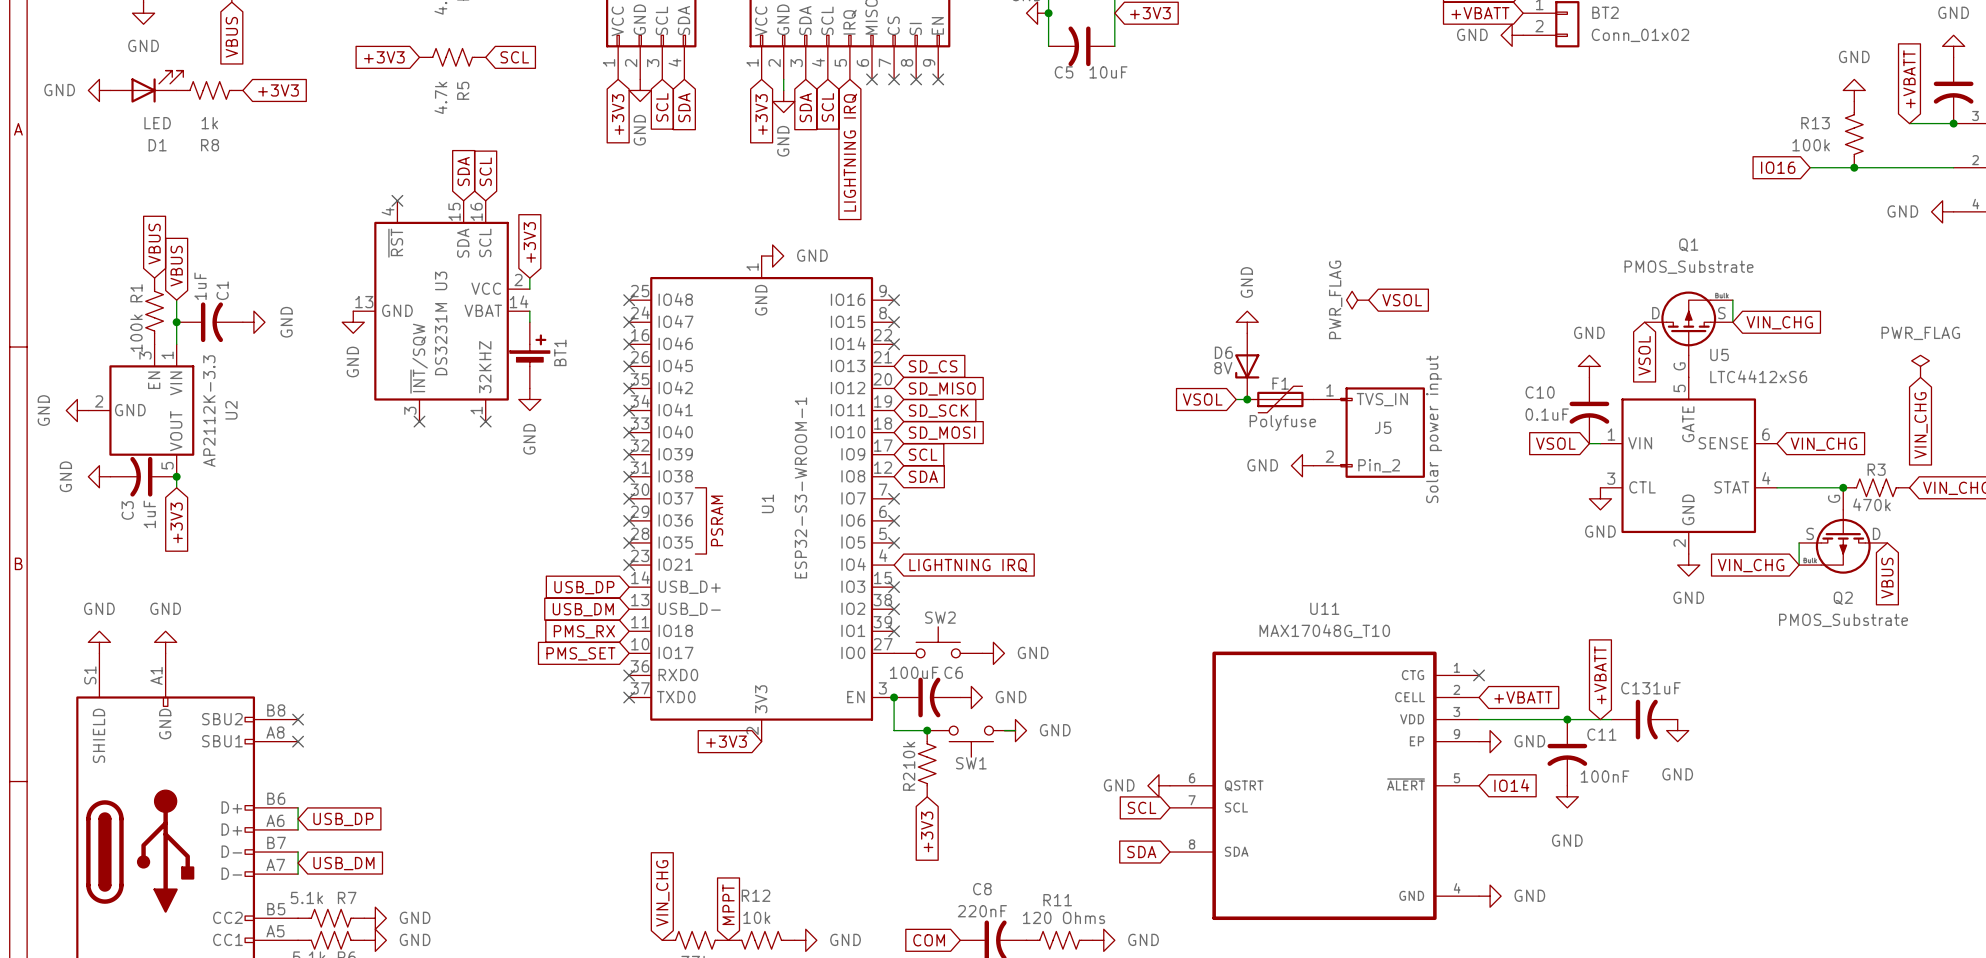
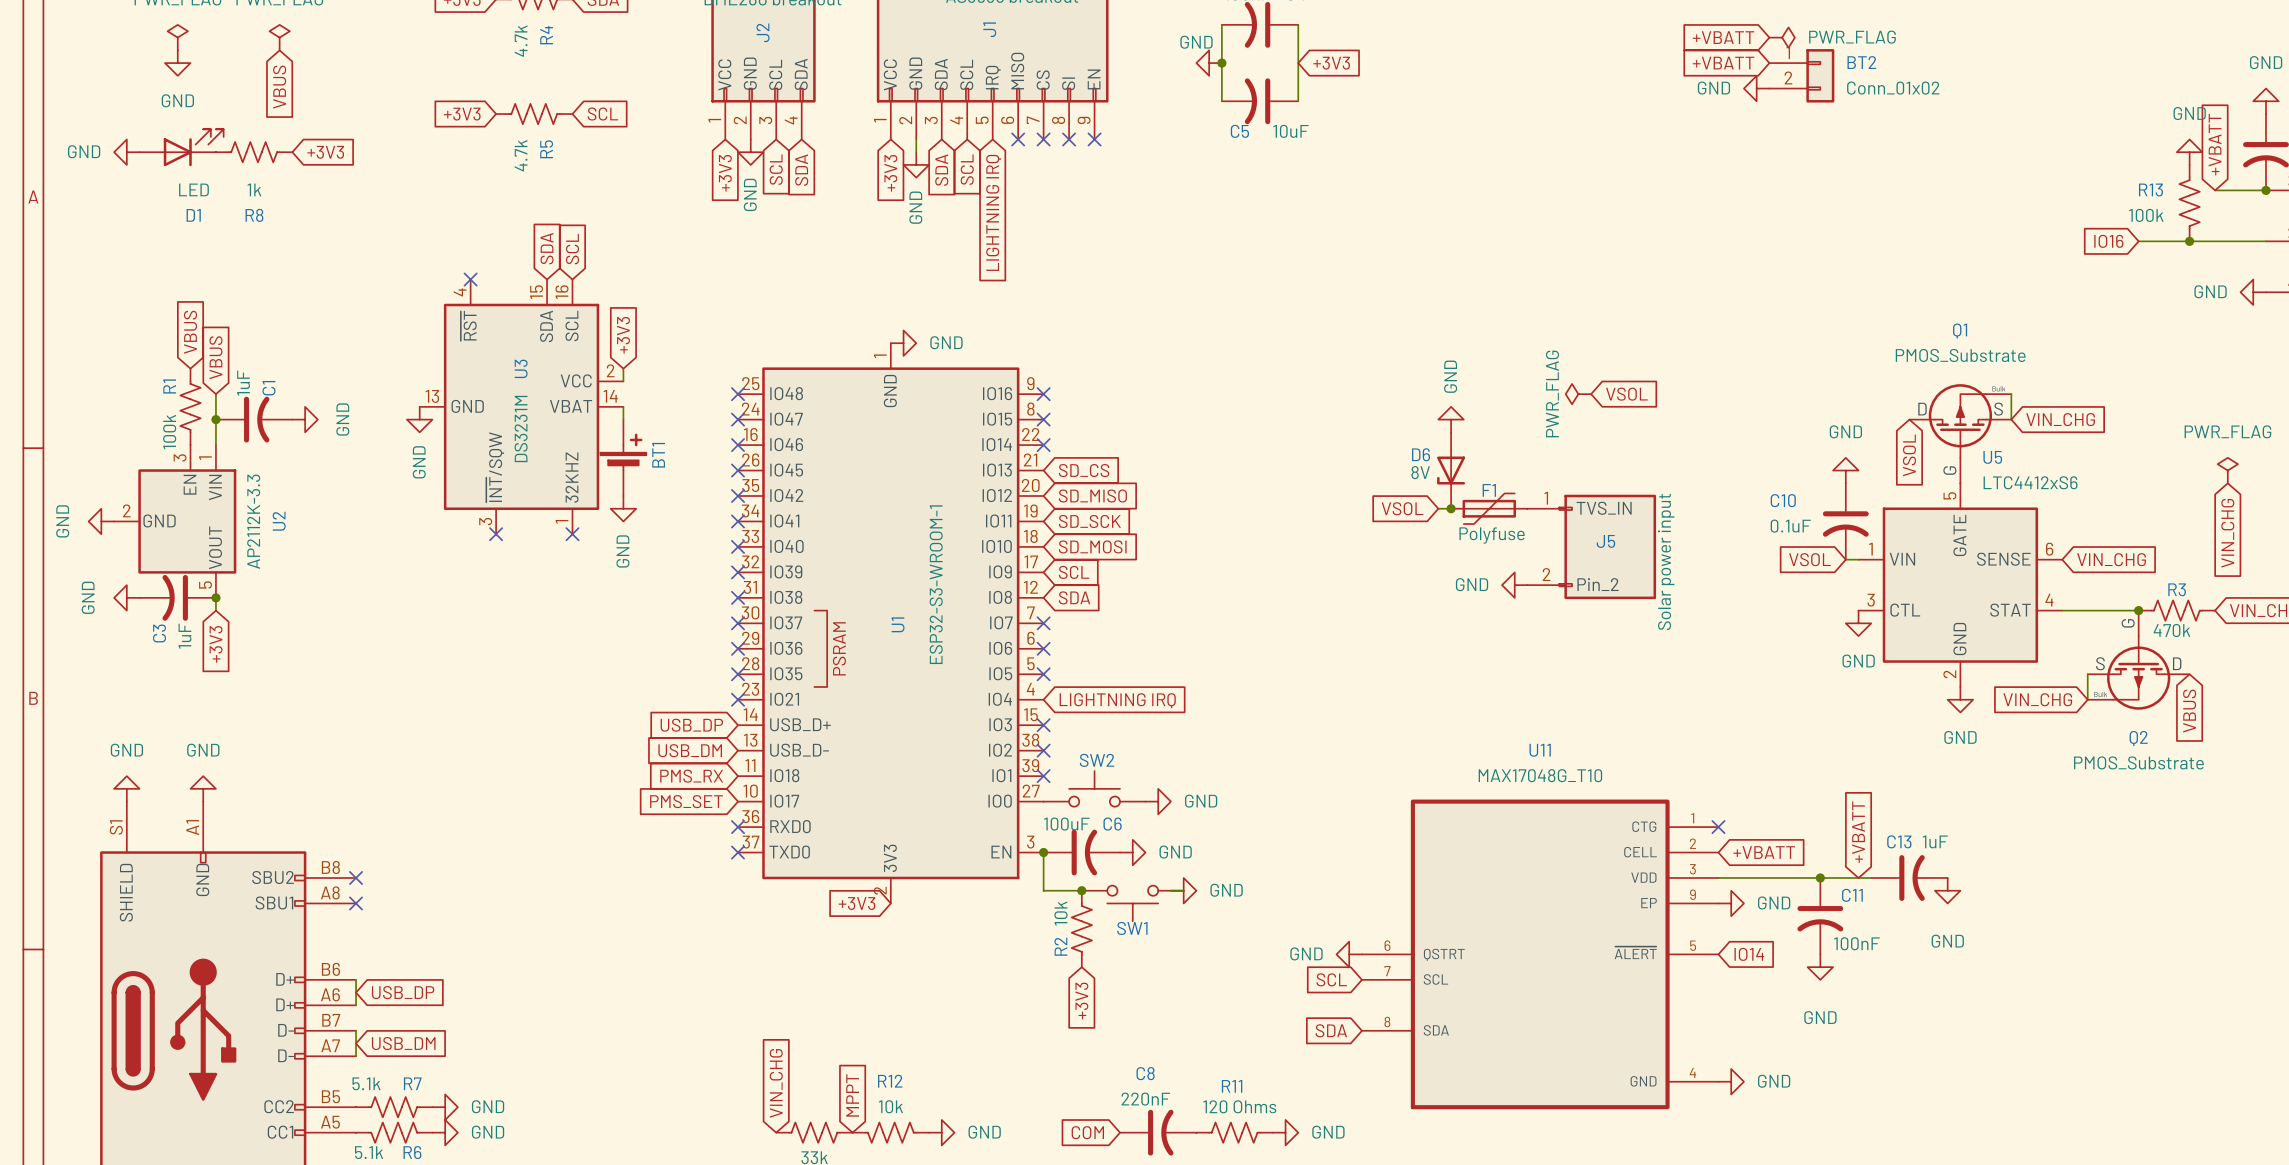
power symbol position: GND (1854, 90) -> GND (2189, 152)
R13 position: (1854, 134) -> (2189, 203)
global label position: IO16 (1778, 167) -> IO16 (2108, 241)
wire: (1810, 167) (1843, 167) -> none
junction position: (1854, 167) -> (2189, 241)

